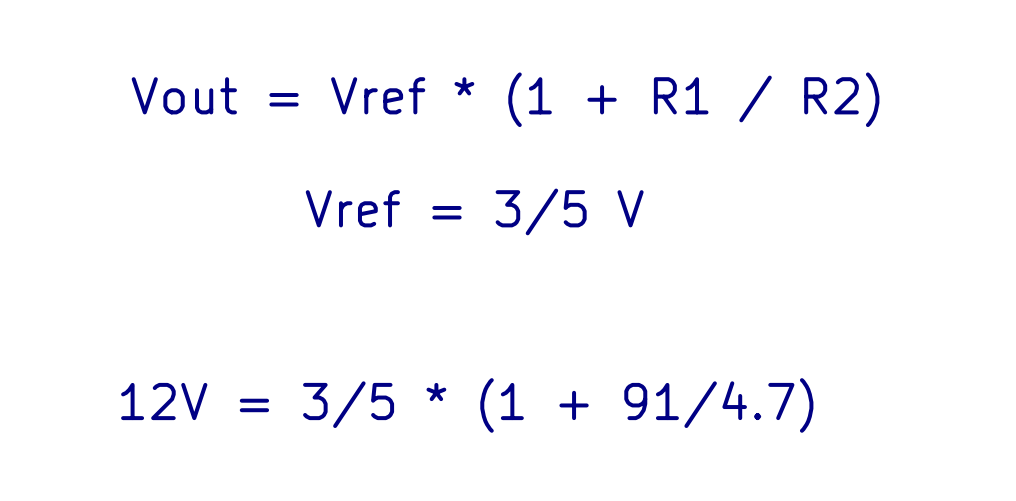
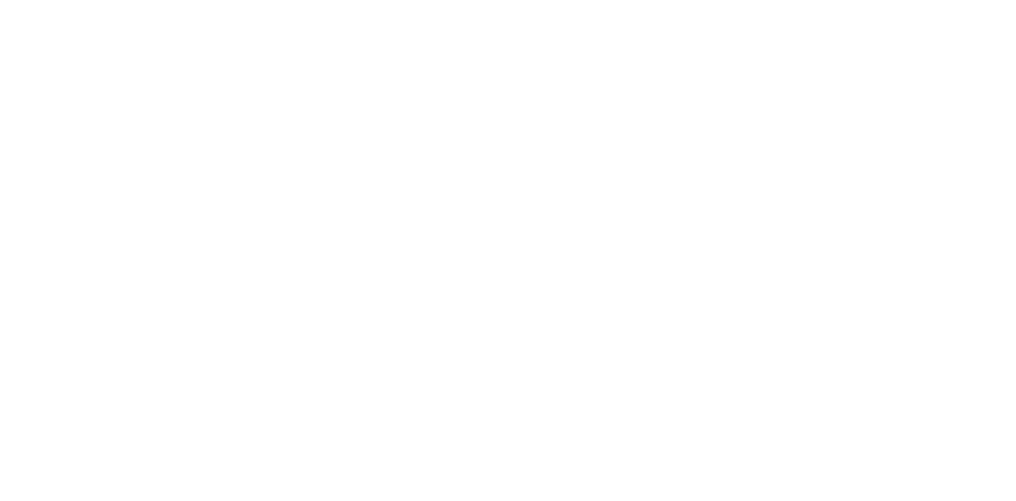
text: Vout = Vref * (1 + R1 / R2) (505, 99) -> none
text: Vref = 3/5 V (474, 211) -> none
text: 12V = 3/5 * (1 + 91/4.7) (467, 405) -> none

